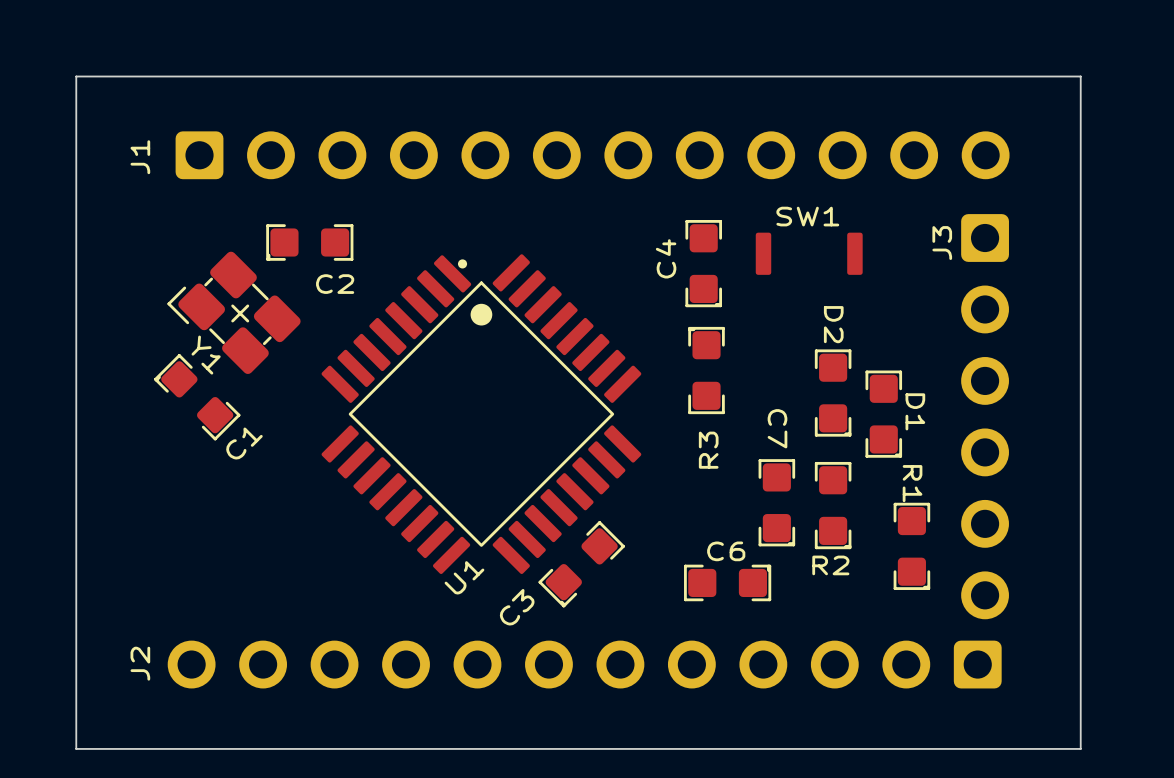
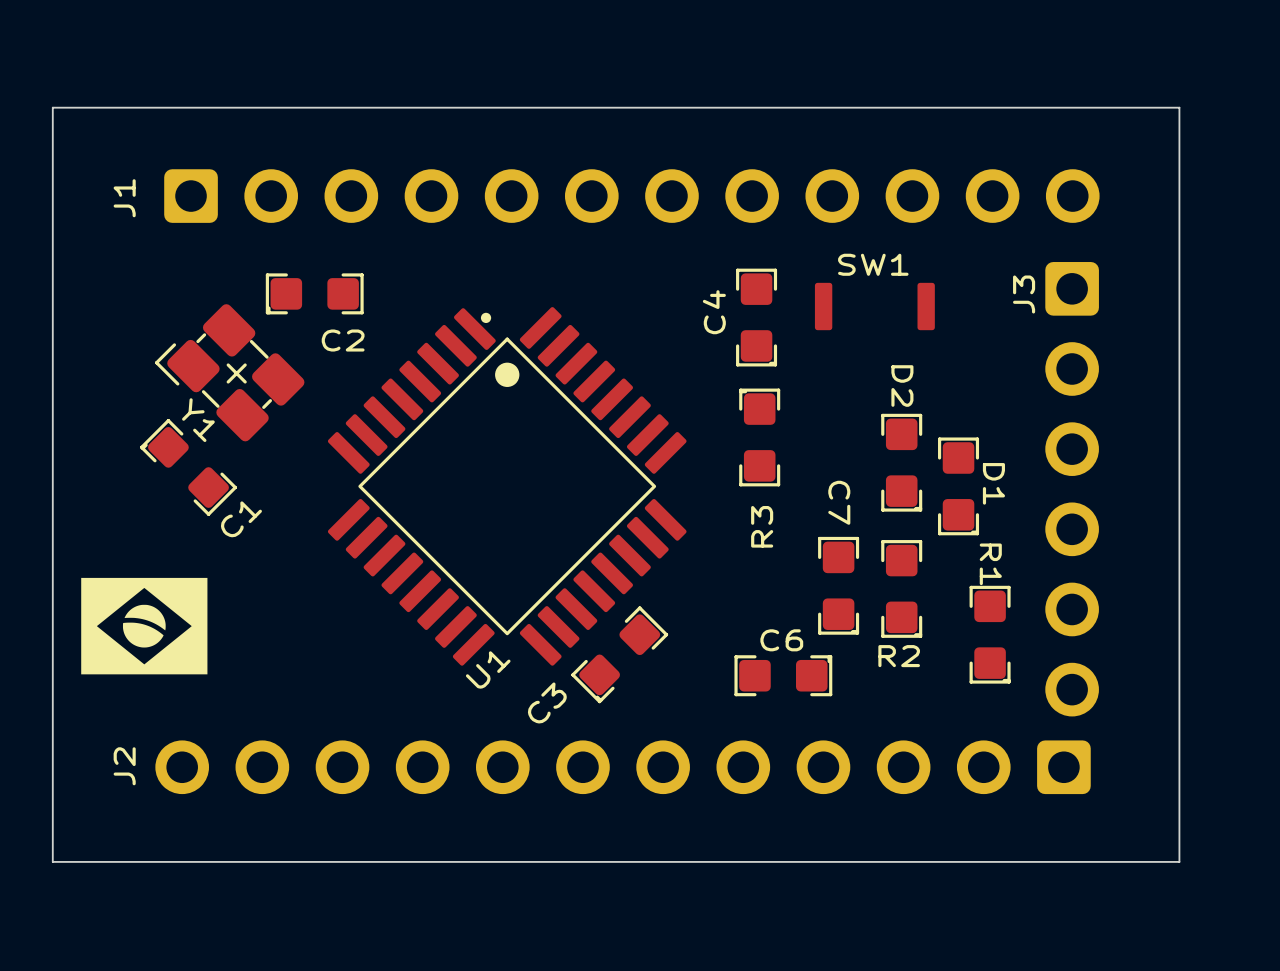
drawing: none -> [81, 577, 208, 675]

